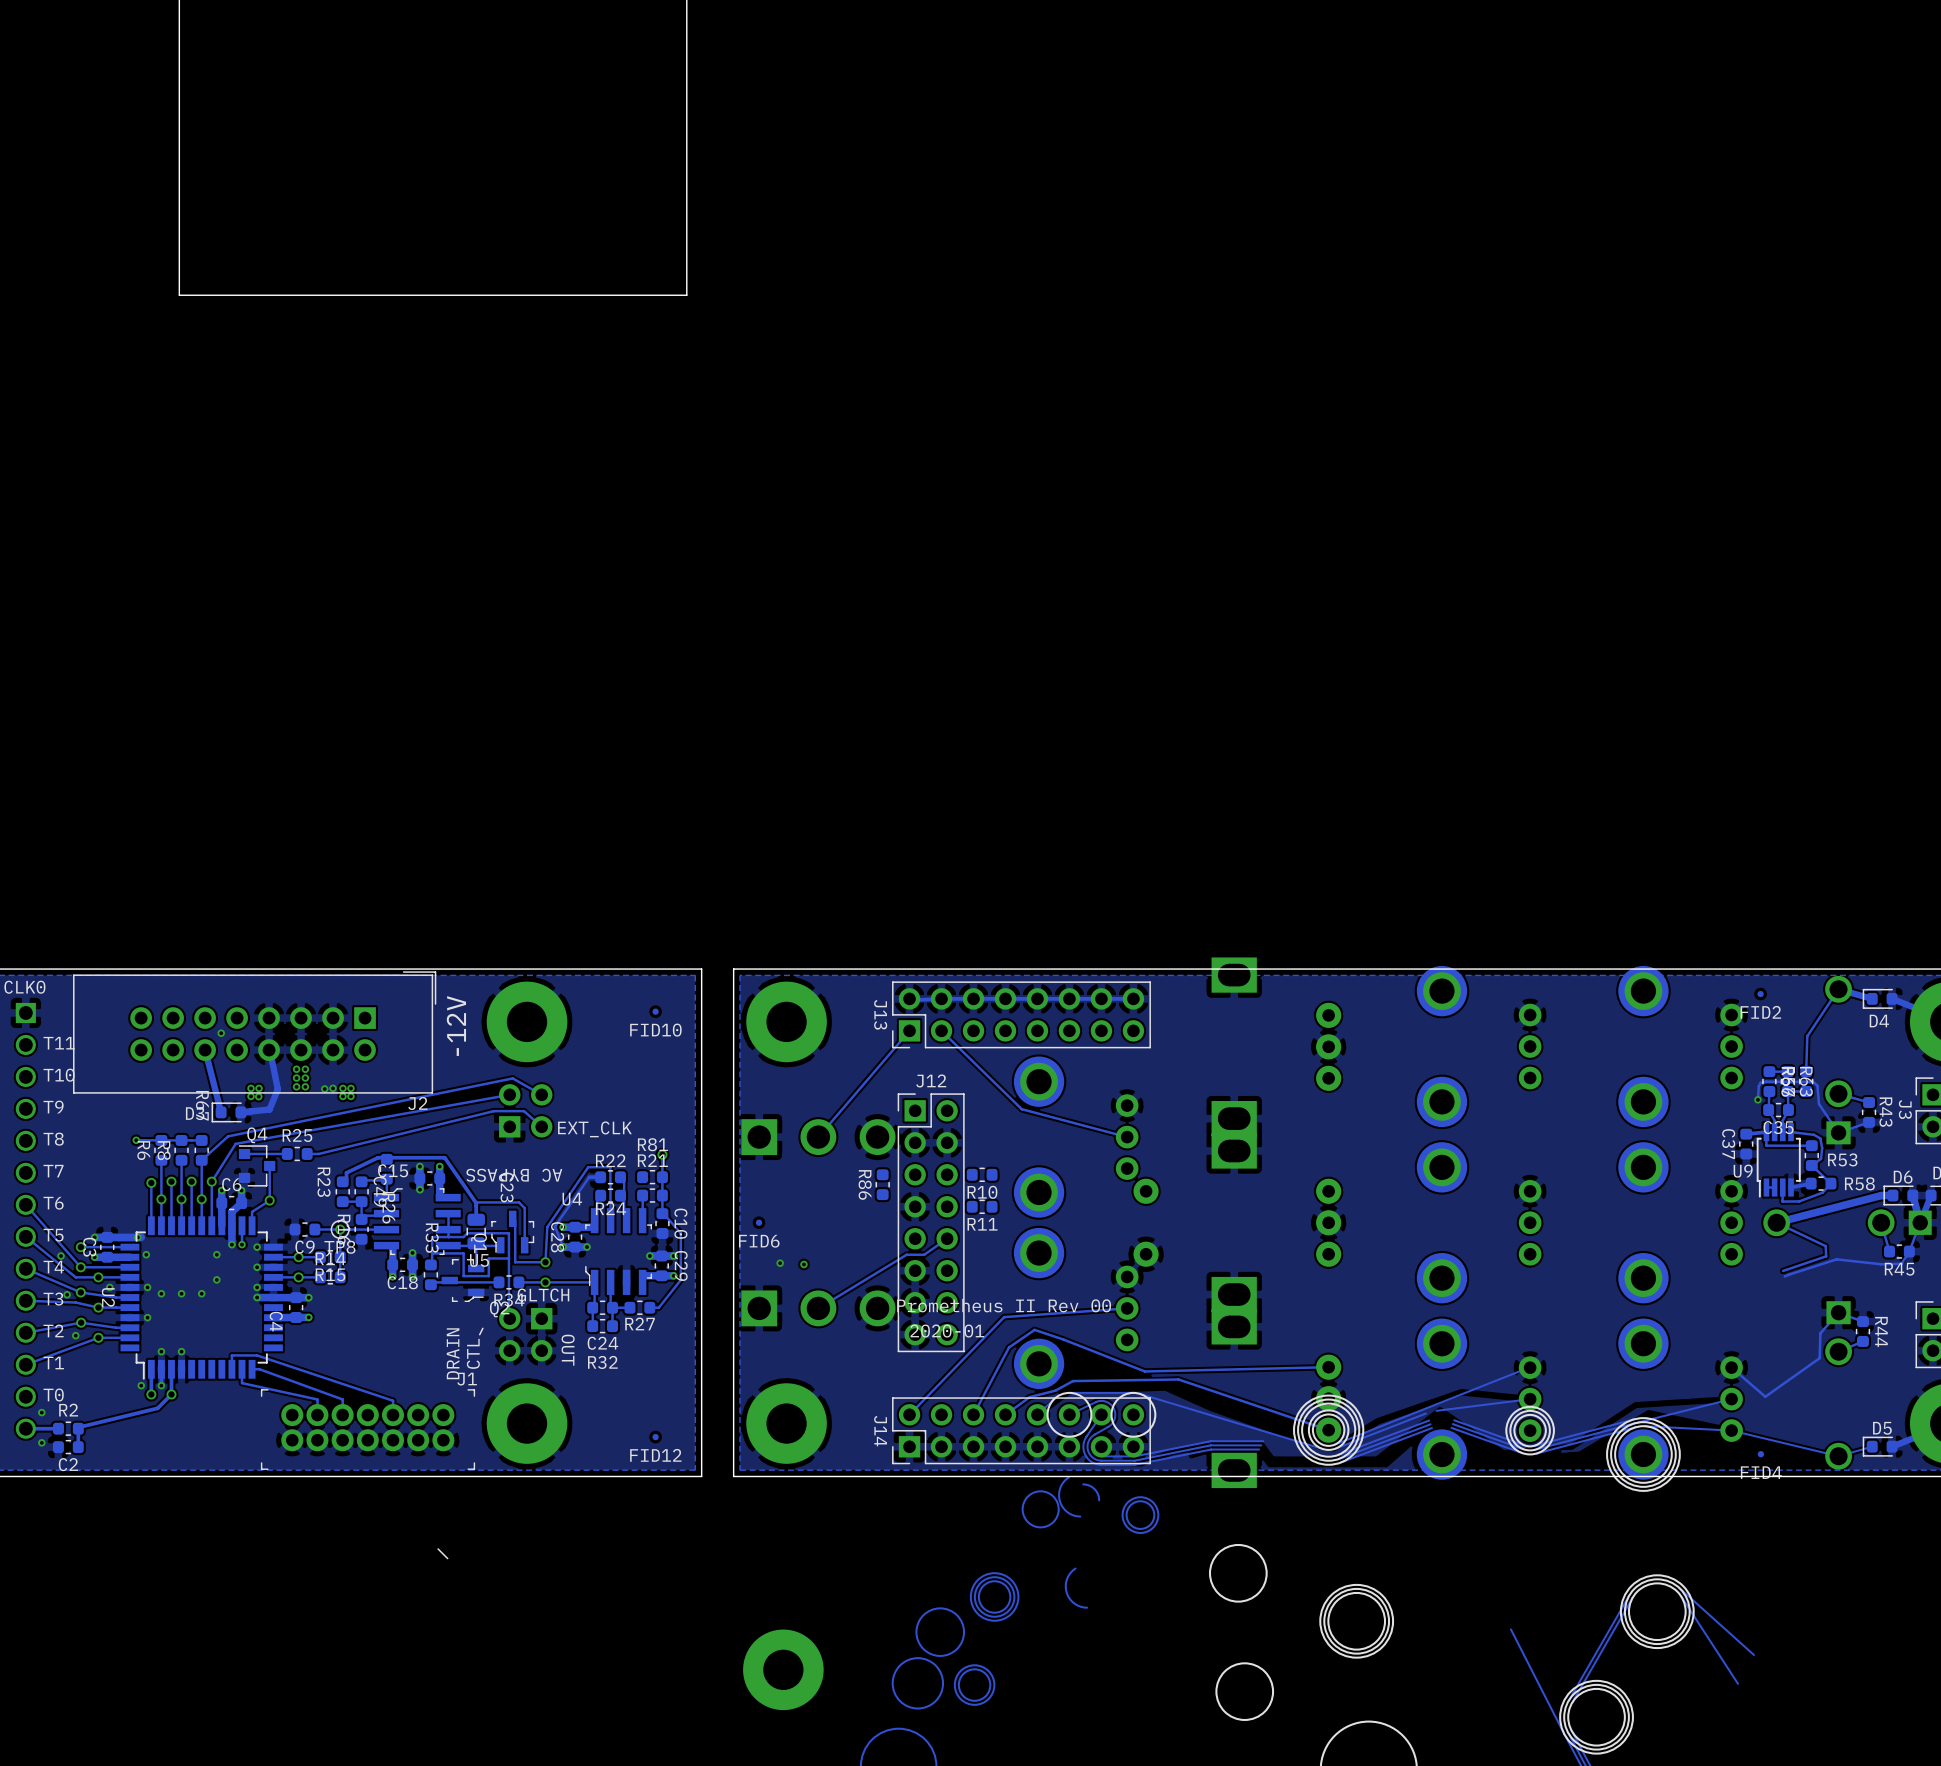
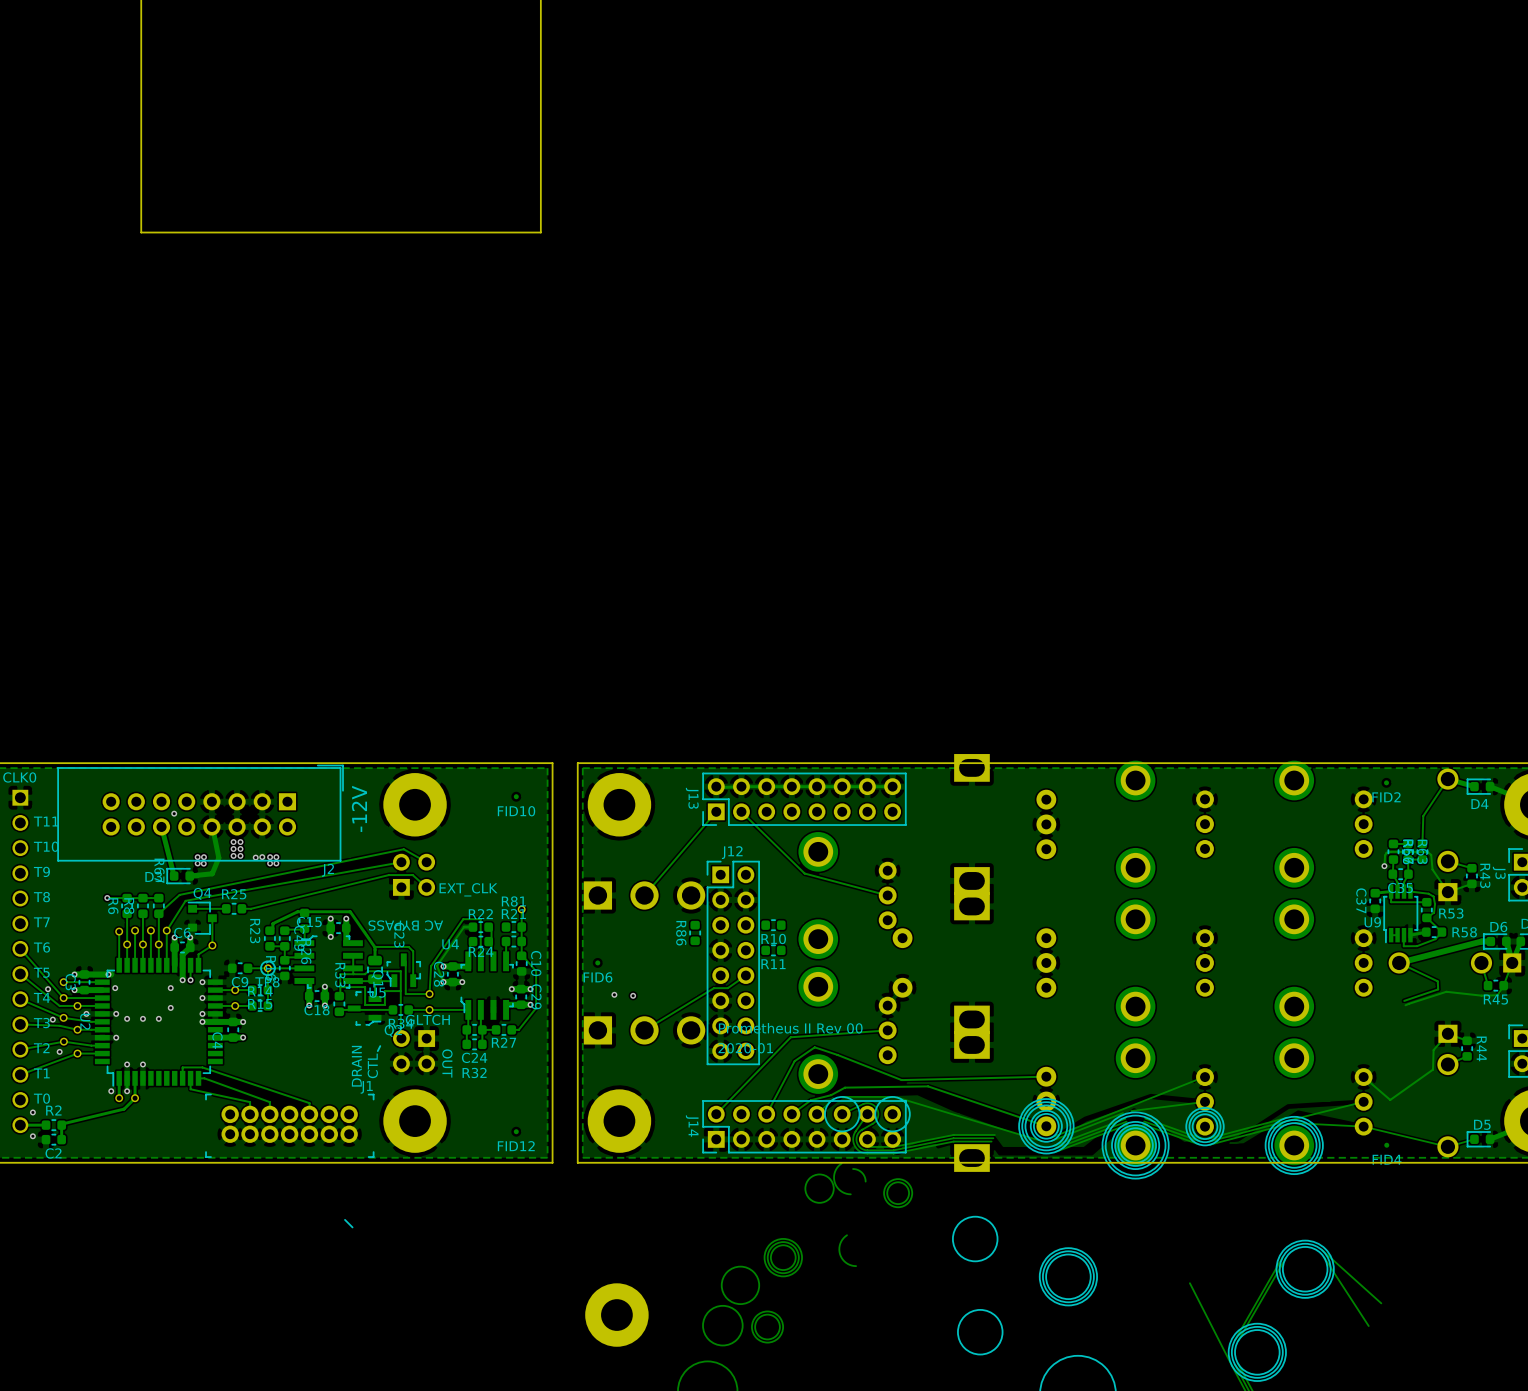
drawing: none -> [1101, 1111, 1170, 1180]

